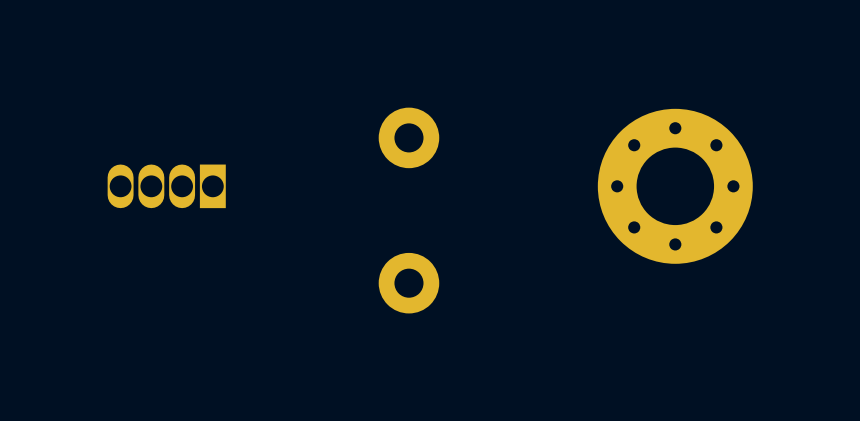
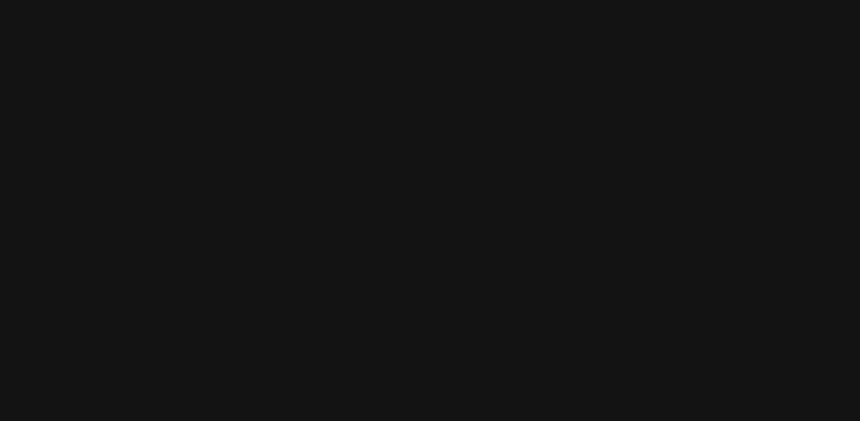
part: (408, 137) -> none
part: (166, 186) -> none
part: (675, 186) -> none
part: (408, 283) -> none

